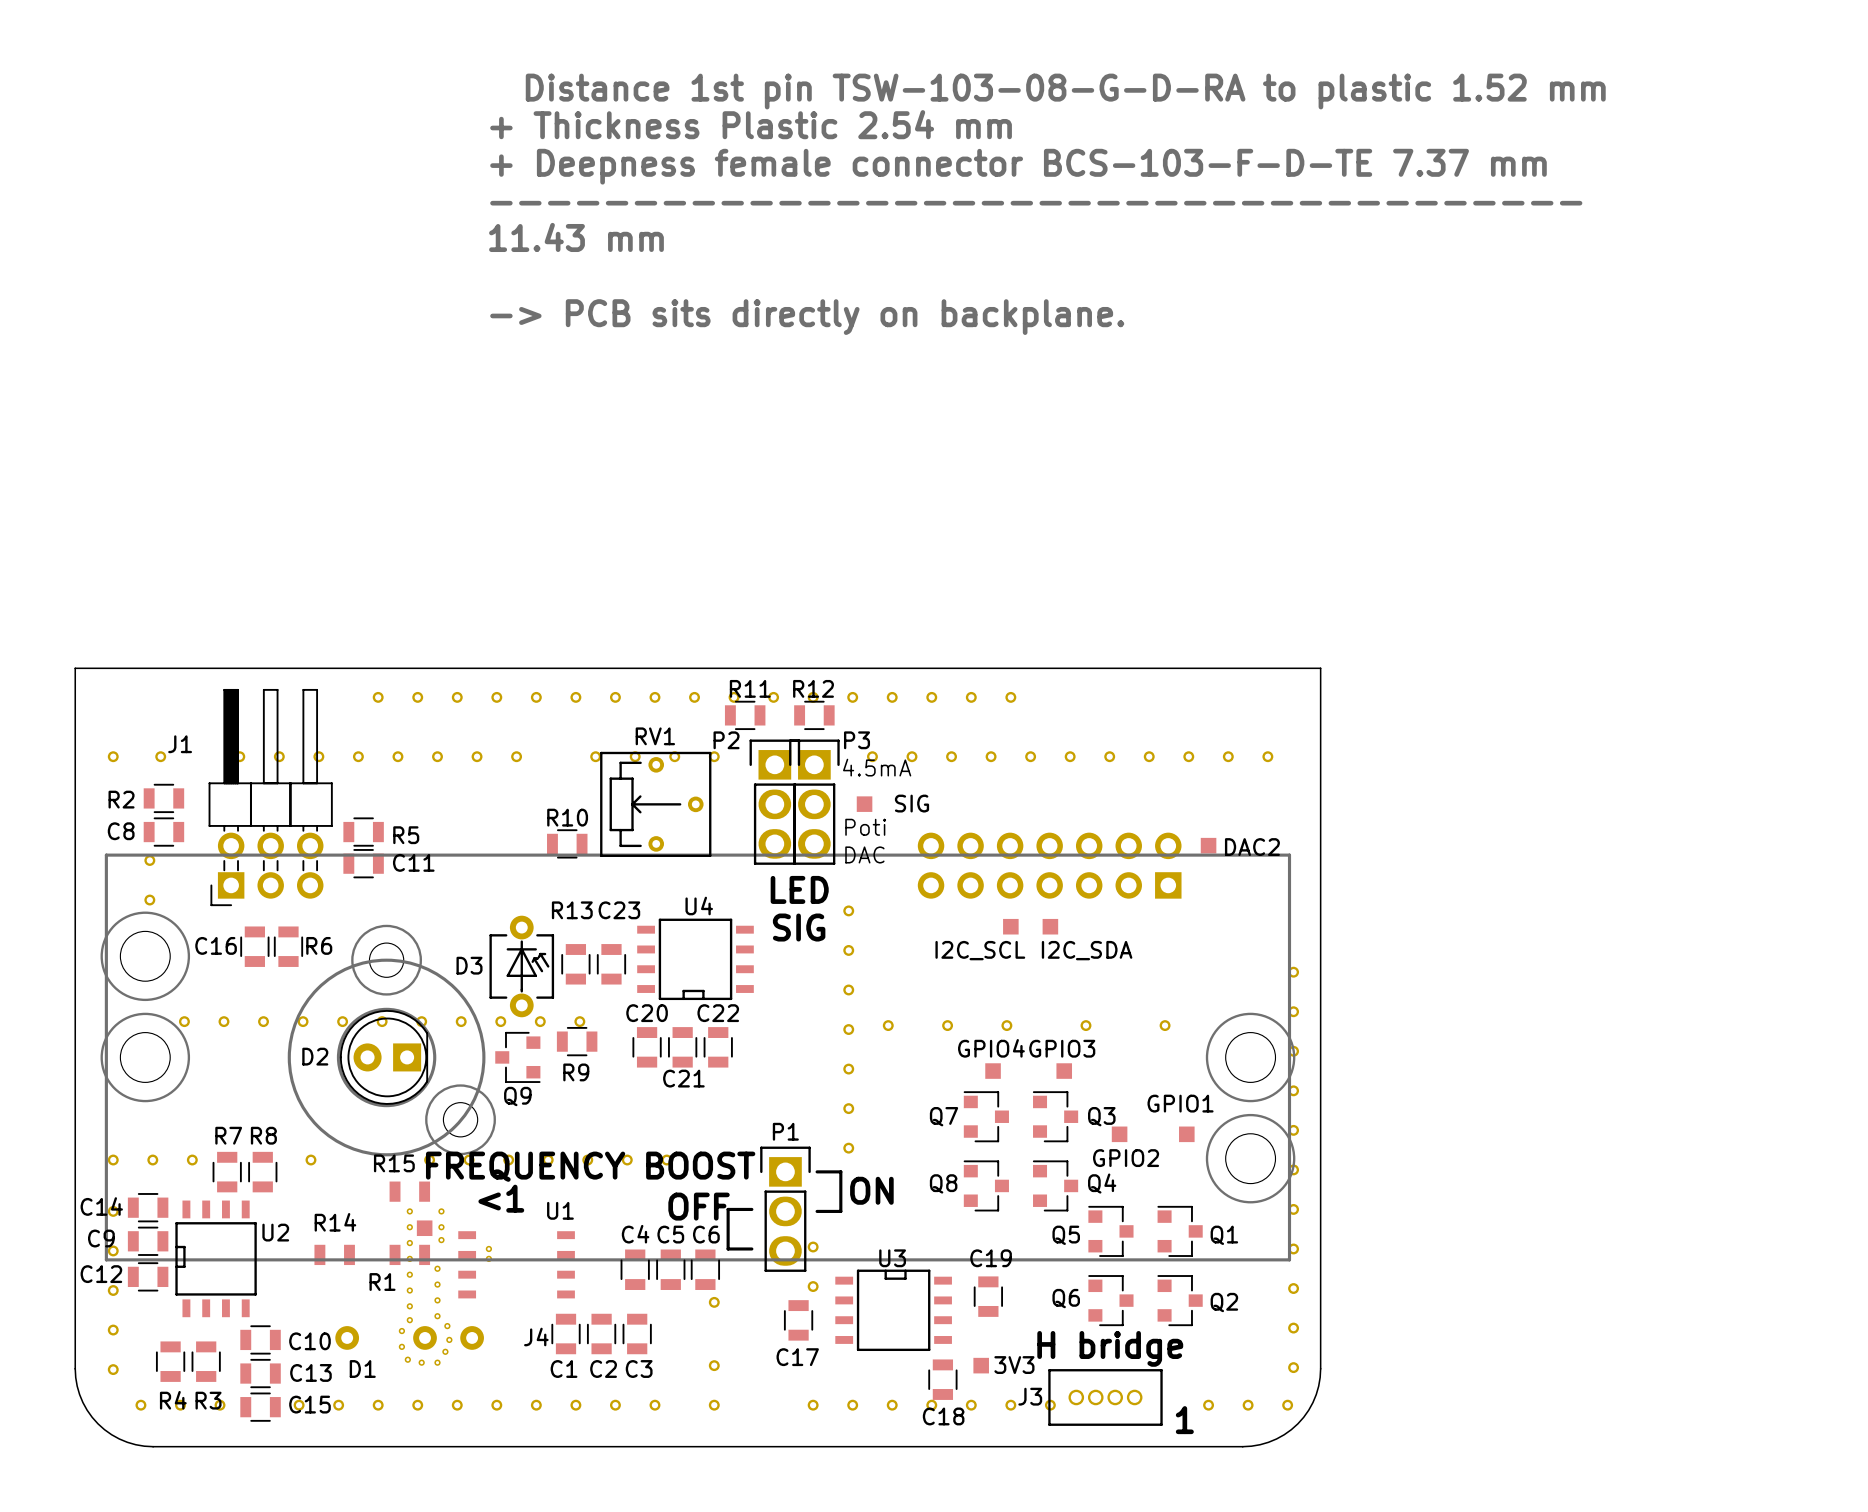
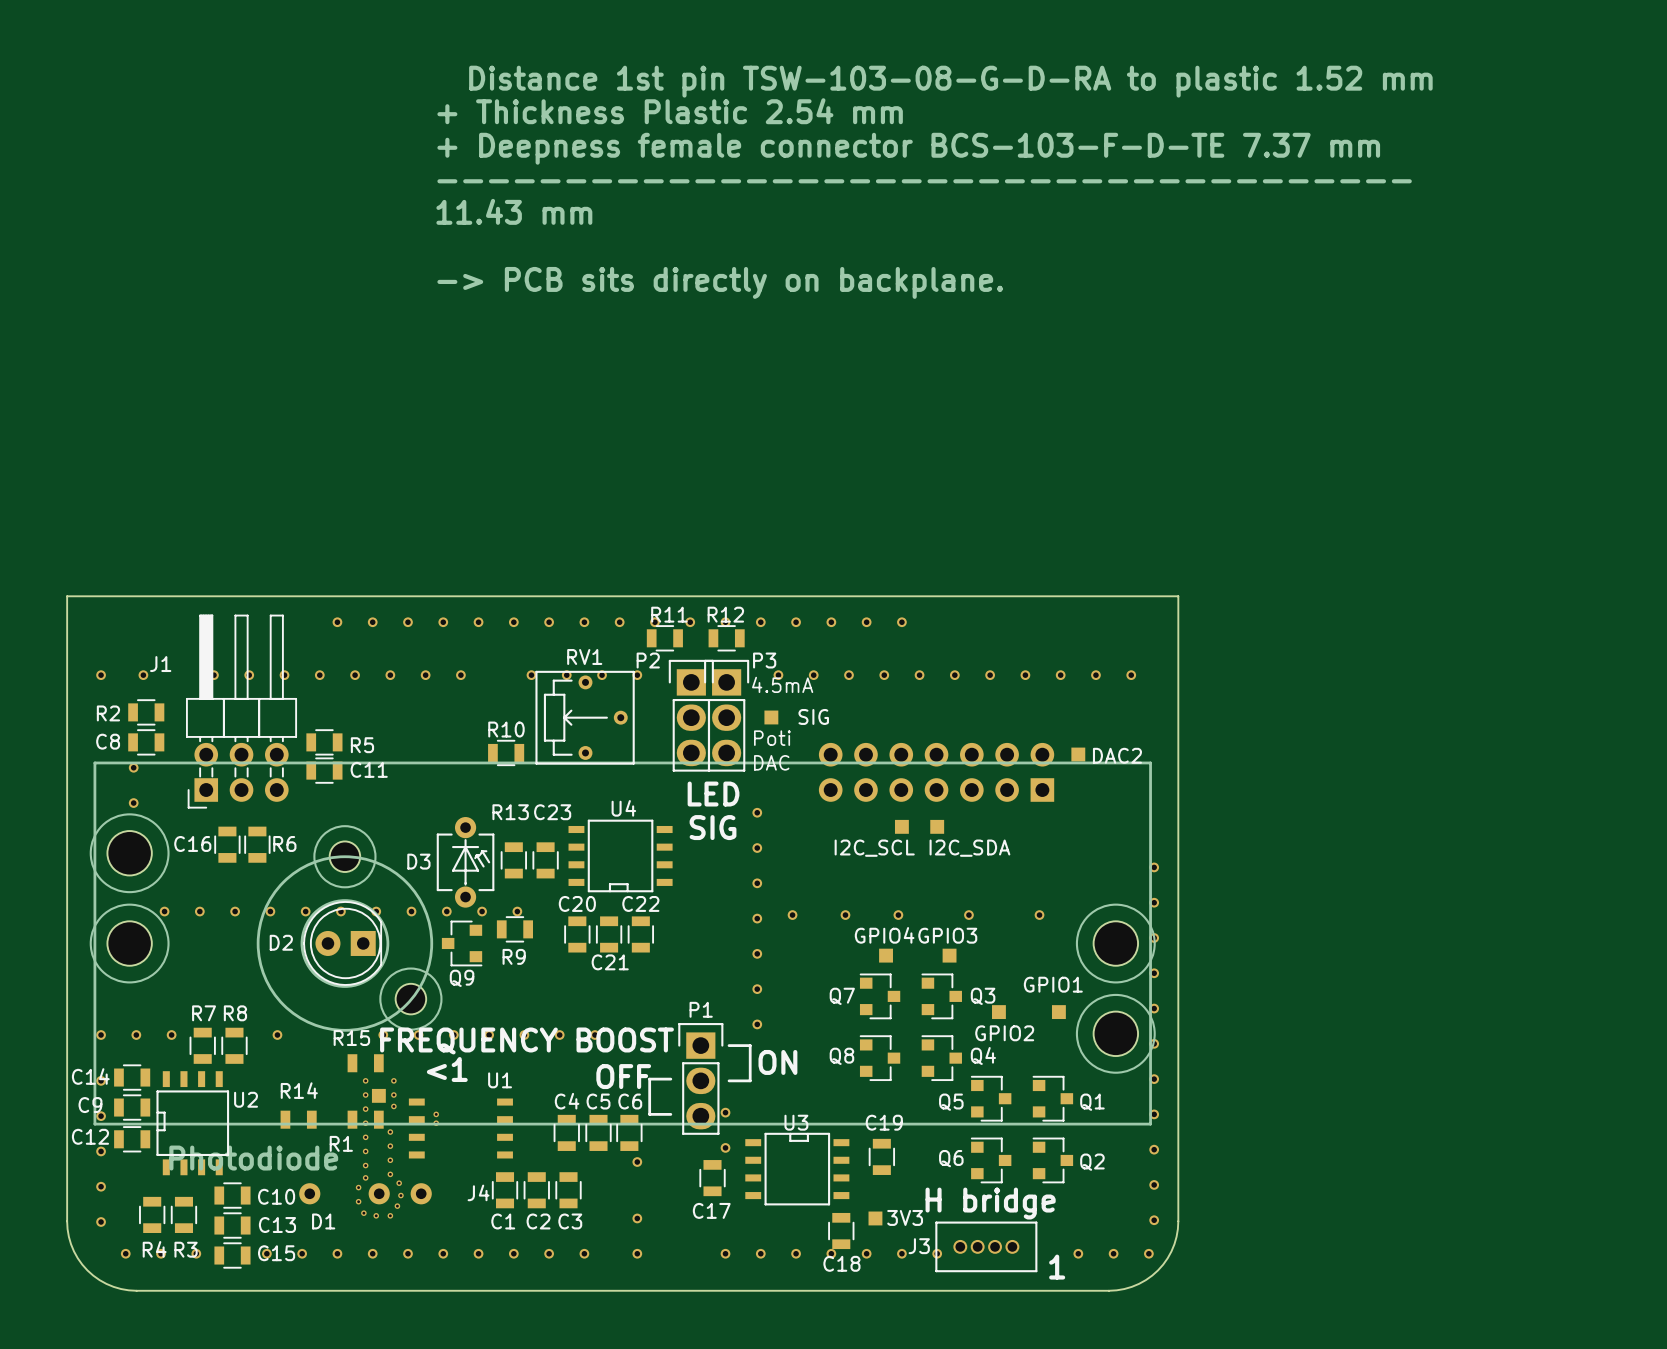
text: none -> Photodiode (253, 1158)

